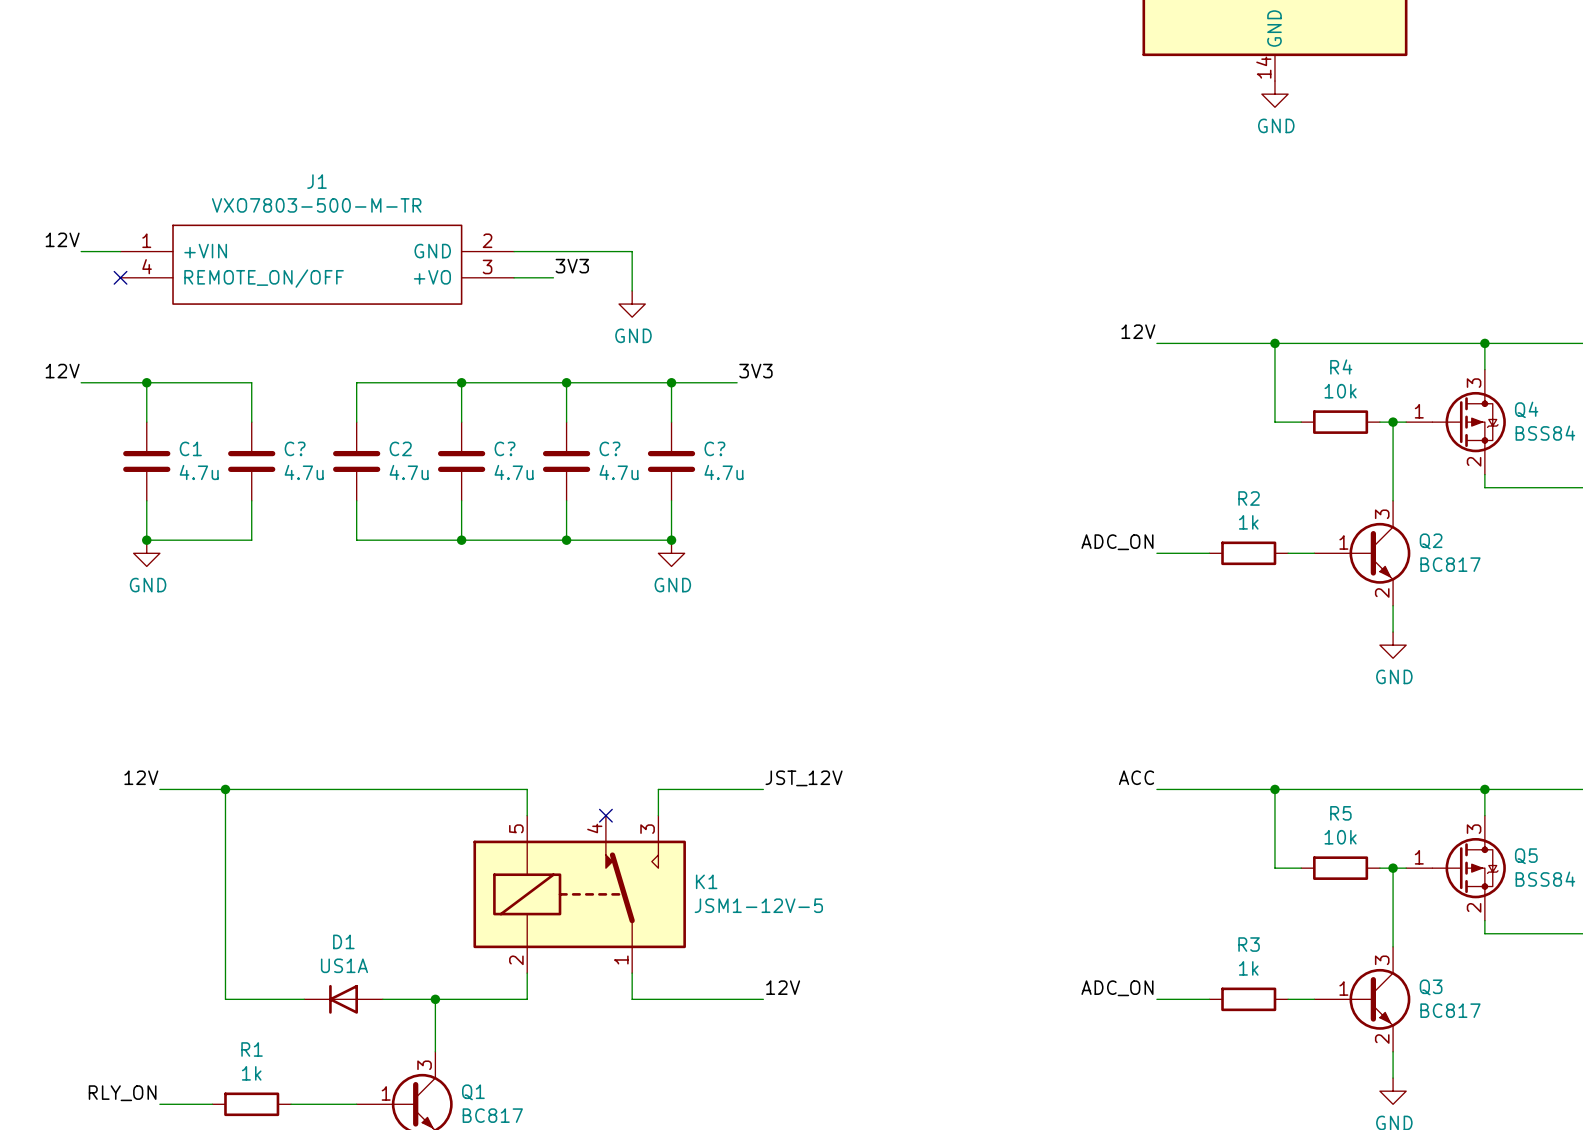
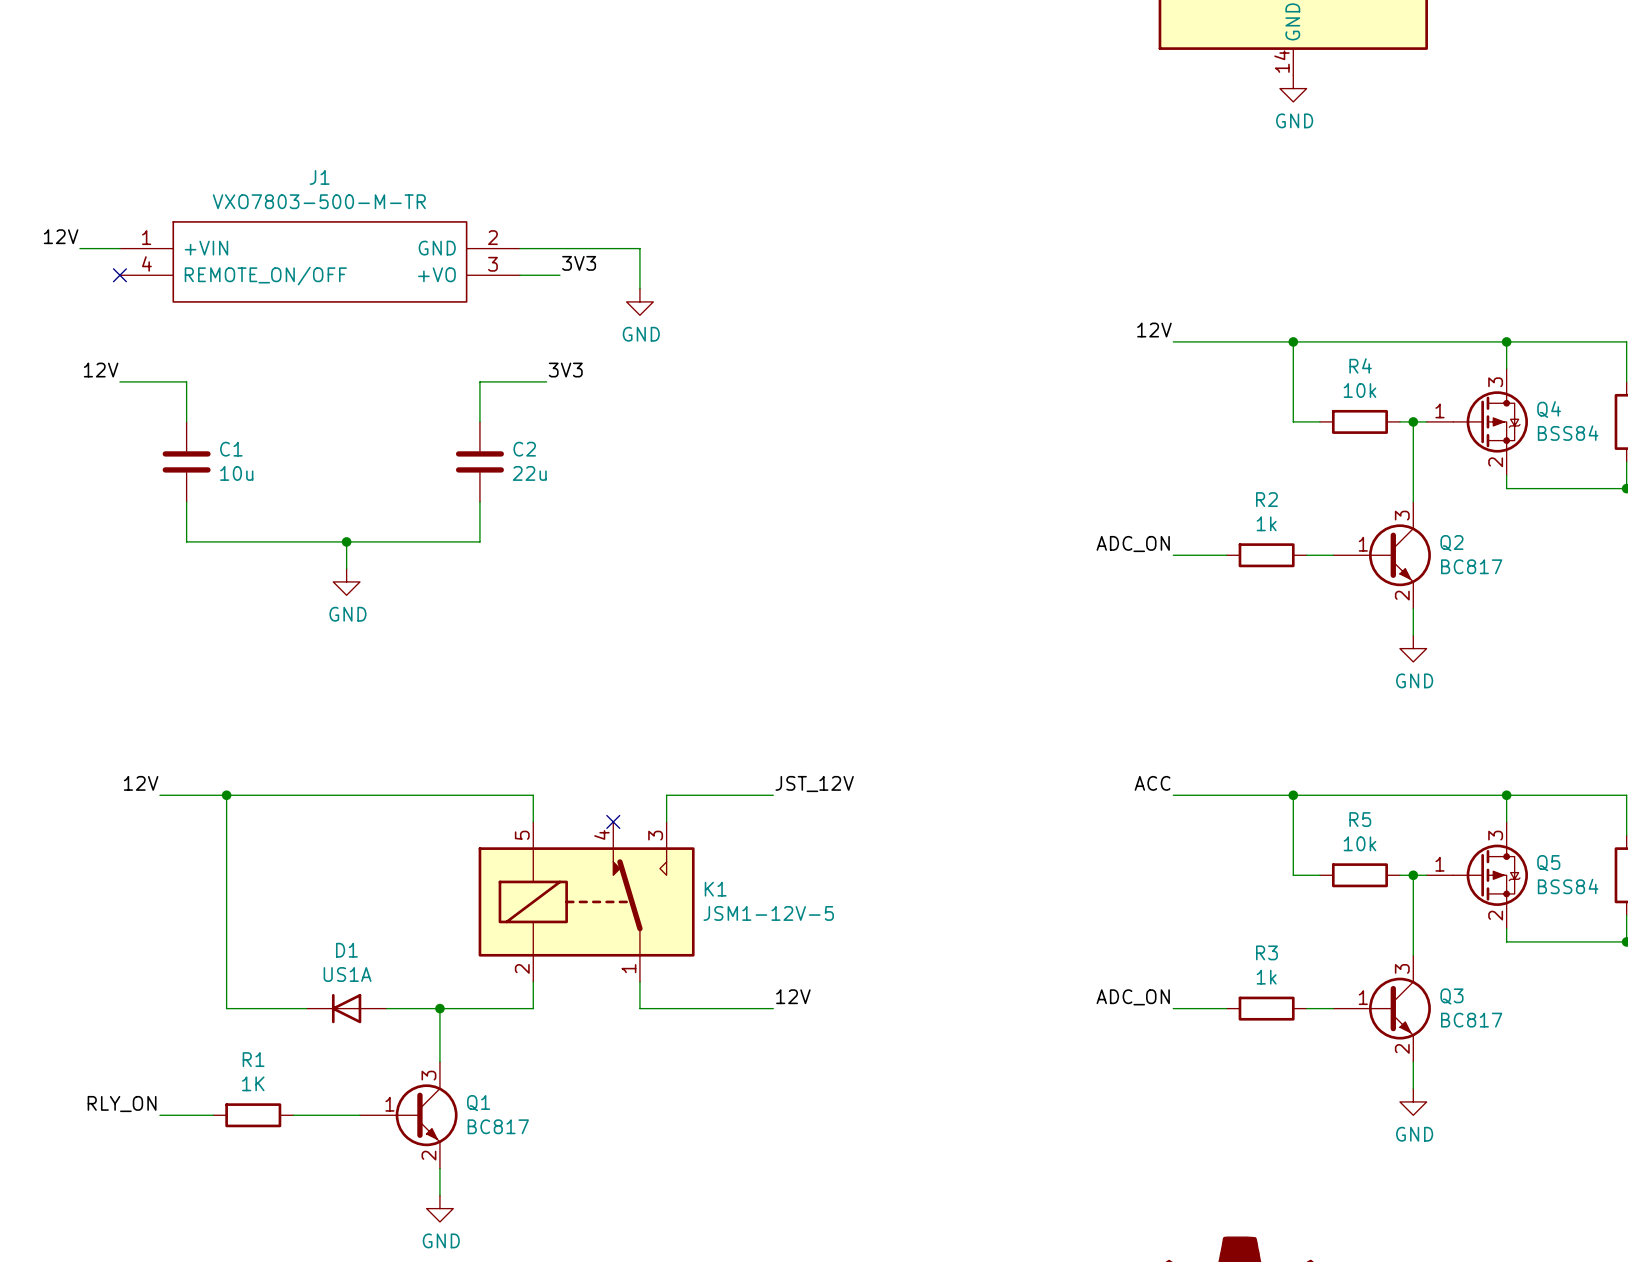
label position: 12V (62, 371) -> 12V (101, 370)
label position: 3V3 (755, 371) -> 3V3 (565, 370)
wire: (81, 382) (120, 382) -> none
wire: (146, 382) (146, 422) -> none
junction: (146, 382) -> none
wire: (186, 382) (251, 382) (251, 422) -> (186, 381) (186, 421)
wire: (461, 382) (461, 422) -> none
junction: (461, 382) -> none
wire: (474, 382) (356, 382) (356, 422) -> (479, 381) (479, 421)
wire: (540, 382) (737, 382) -> none
wire: (566, 382) (566, 422) -> none
junction: (566, 382) -> none
wire: (671, 382) (671, 422) -> none
junction: (671, 382) -> none
C1 position: (146, 461) -> (186, 461)
C?: 4.7u (251, 461) -> none
C2 position: (356, 461) -> (479, 461)
C?: 4.7u (461, 461) -> none
C?: 4.7u (566, 461) -> none
C?: 4.7u (671, 461) -> none
C1 value: 4.7u (199, 472) -> 10u (236, 473)
C2 value: 4.7u (409, 472) -> 22u (529, 473)
wire: (146, 500) (146, 540) (186, 540) -> (186, 501) (186, 541)
wire: (251, 500) (251, 540) -> (359, 541) (253, 541)
wire: (356, 500) (356, 540) -> none
wire: (461, 500) (461, 540) -> none
wire: (566, 500) (566, 540) -> none
wire: (671, 500) (671, 540) (474, 540) -> (479, 501) (479, 541)
junction: (146, 540) -> none
wire: none -> (346, 541) (346, 568)
junction: none -> (346, 541)
junction: (461, 540) -> none
junction: (566, 540) -> none
junction: (671, 540) -> none
power symbol: GND (146, 553) -> none
power symbol: GND (671, 553) -> none
power symbol: none -> GND (346, 581)
R1 value: 1k (251, 1073) -> 1K (253, 1083)

